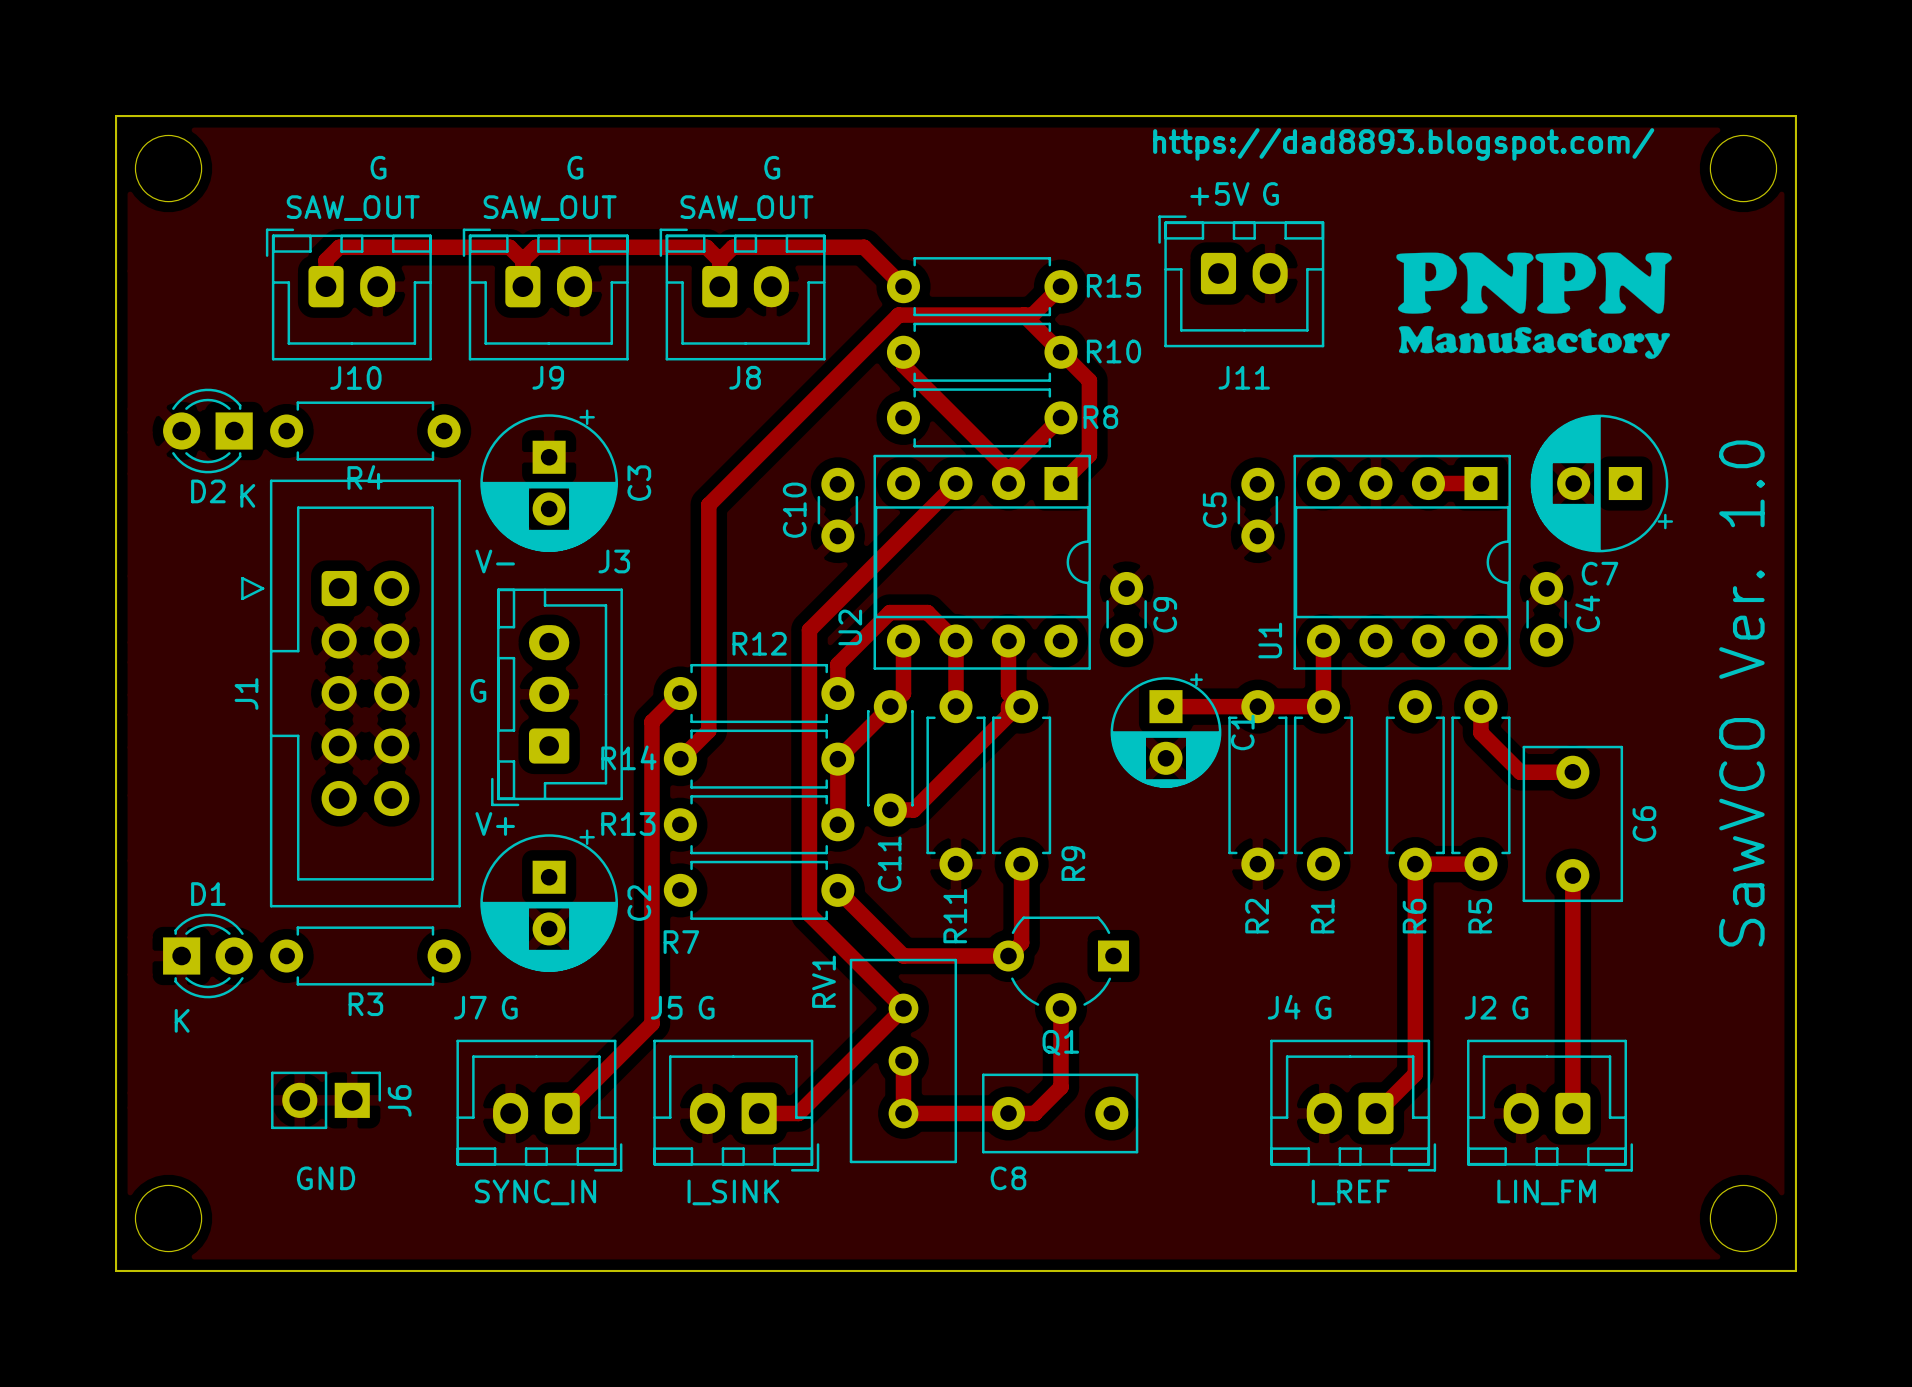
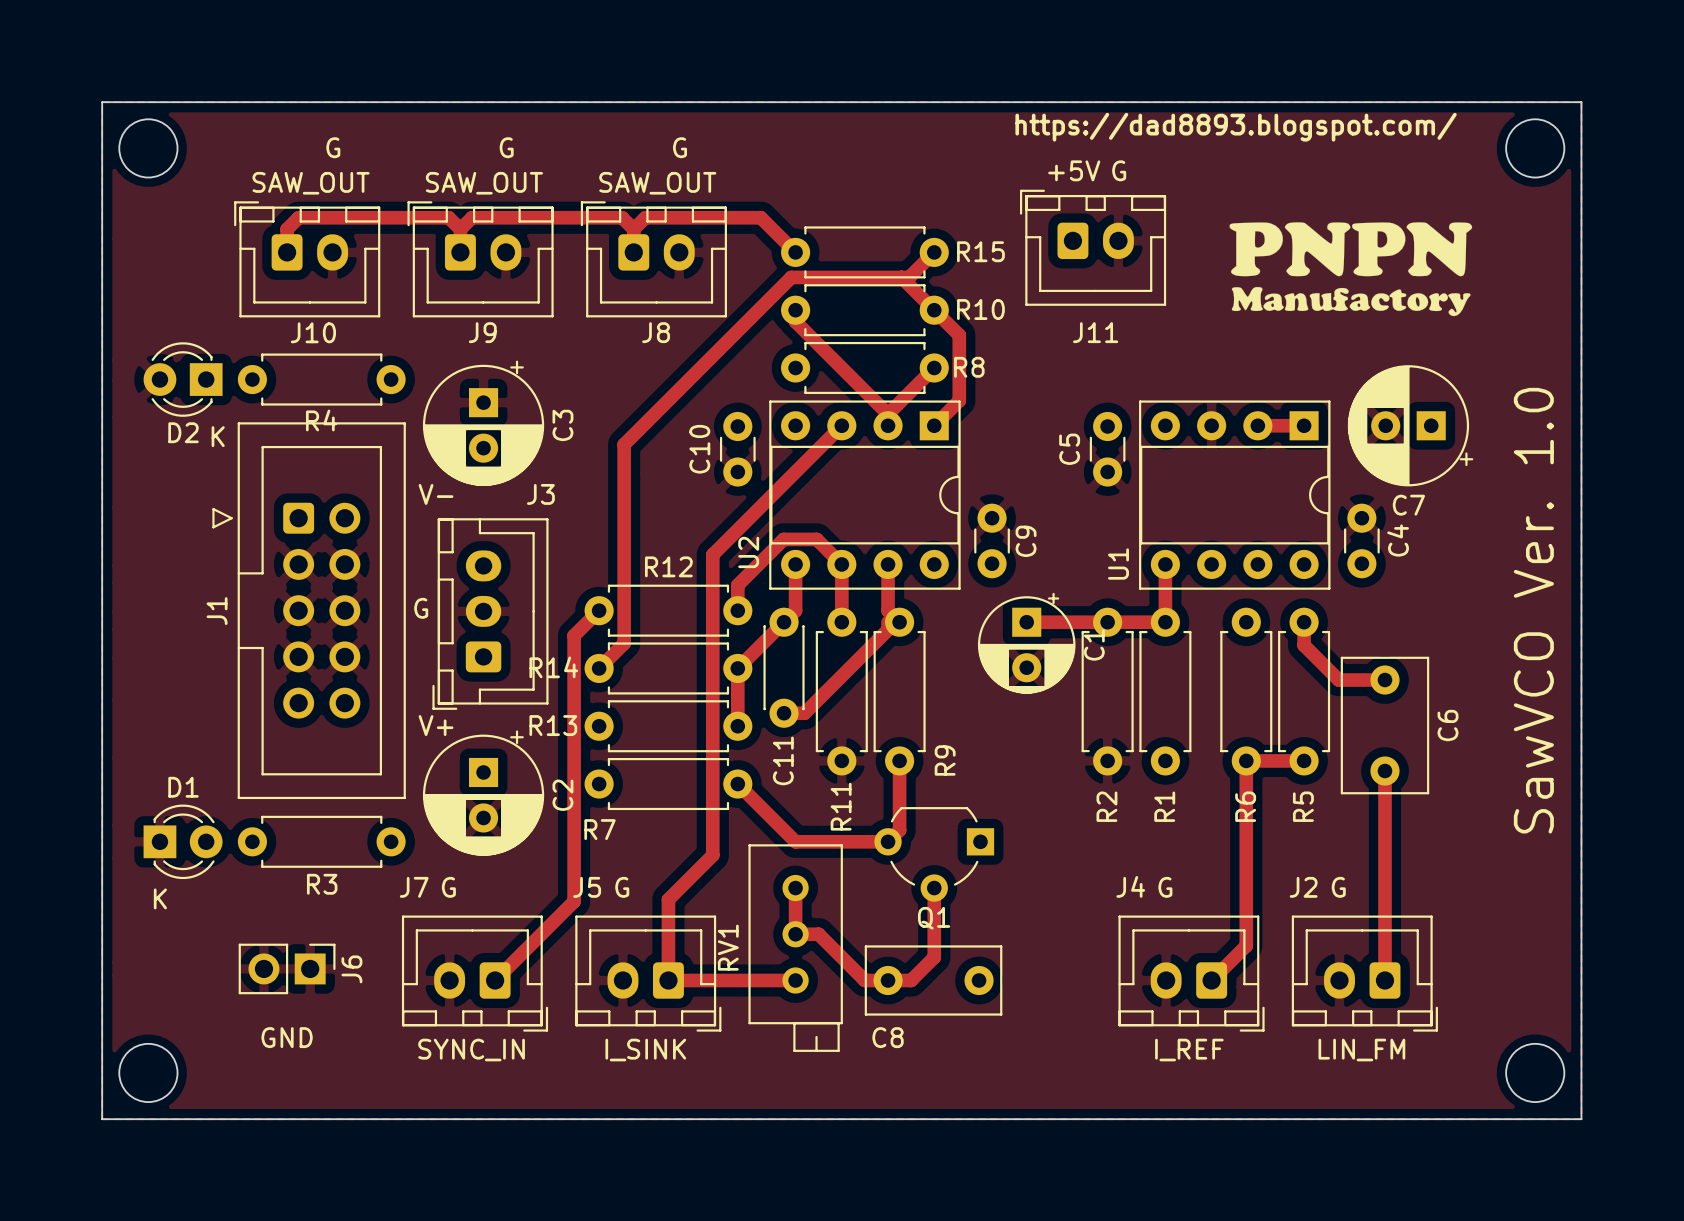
track: (809, 914) (903, 1008) (798, 1113) -> (712, 805) (712, 855) (668, 899) (668, 980)
RV1 footprint: [849, 958, 958, 1164] -> [748, 844, 843, 1052]
RV1 name position: RV1 (823, 981) -> RV1 (728, 947)
track: (903, 1060) (903, 1113) (982, 1113) -> (795, 888) (795, 934) (818, 934) (864, 980)
track: none -> (703, 980) (795, 980)

